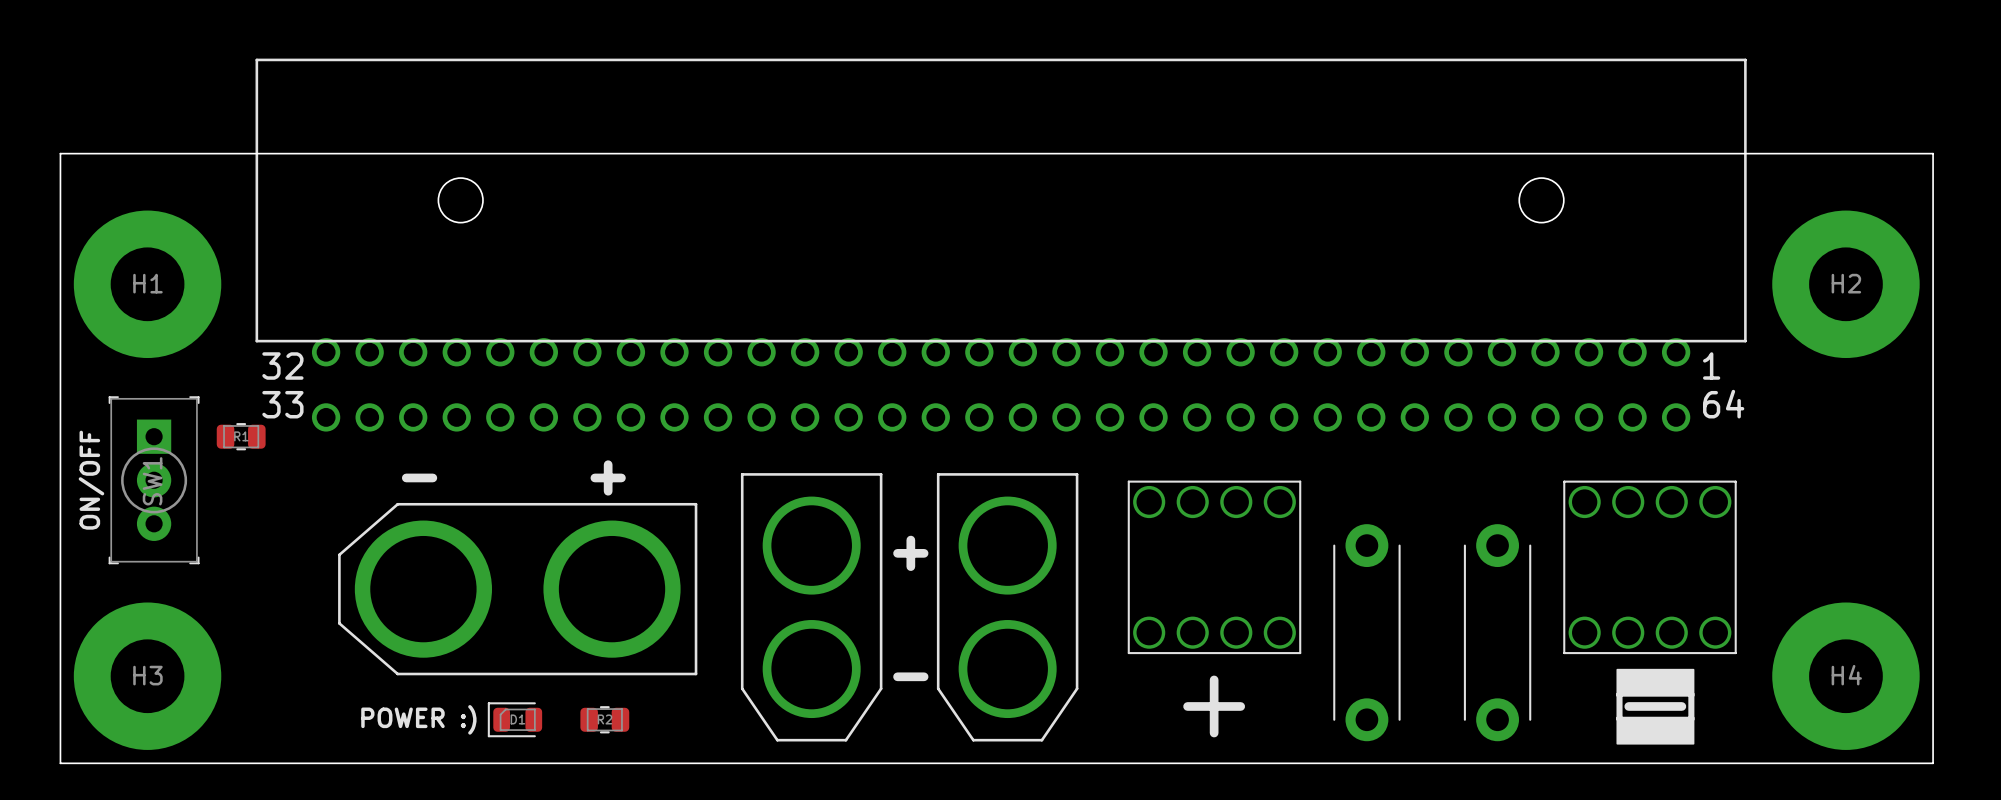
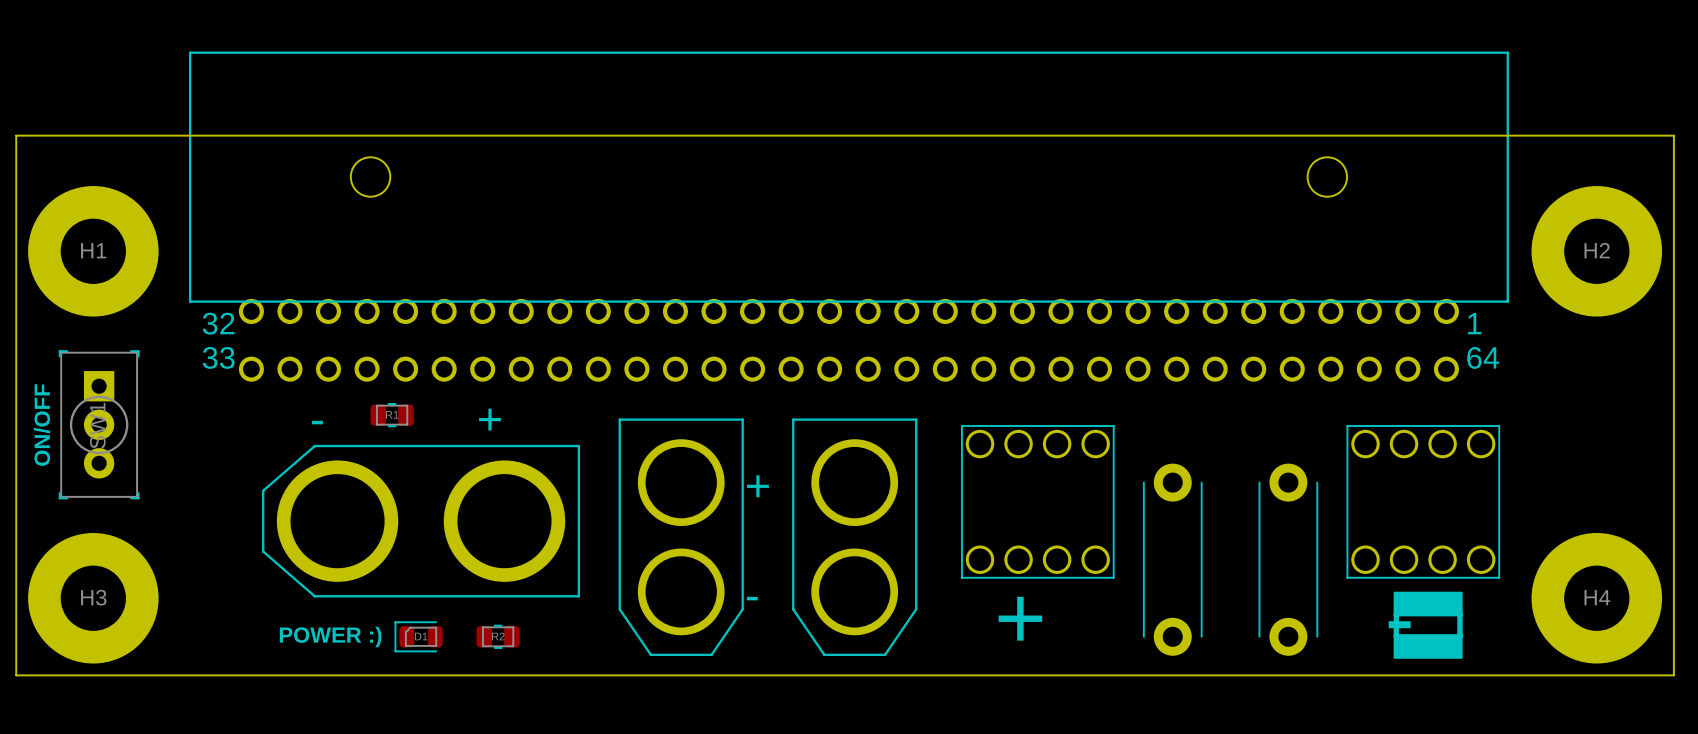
R1 position: (241, 436) -> (392, 415)

